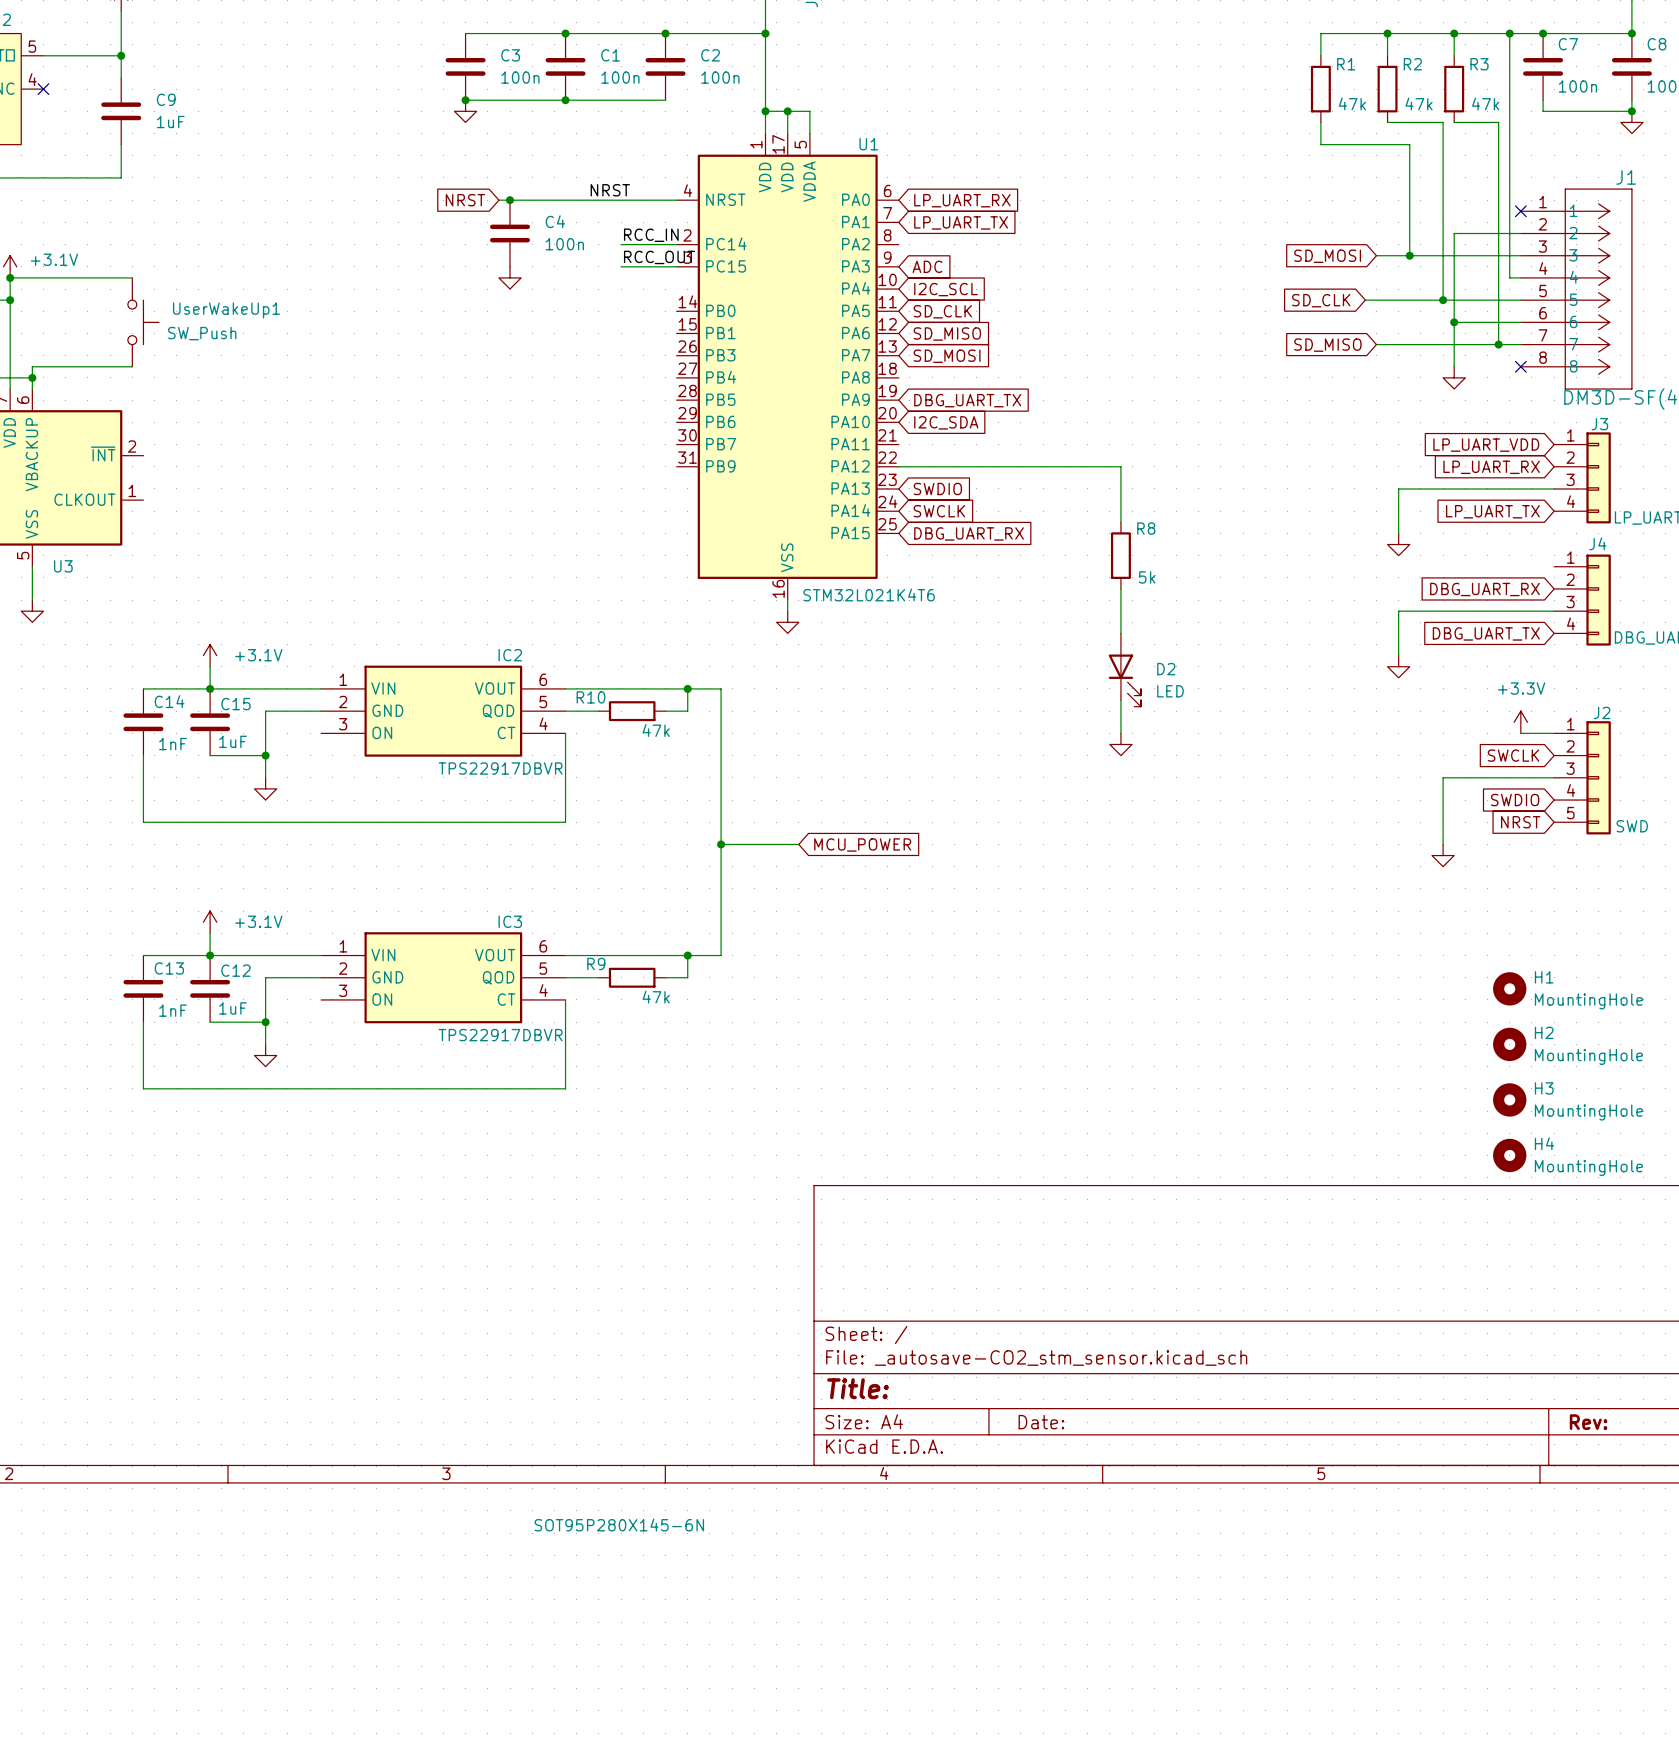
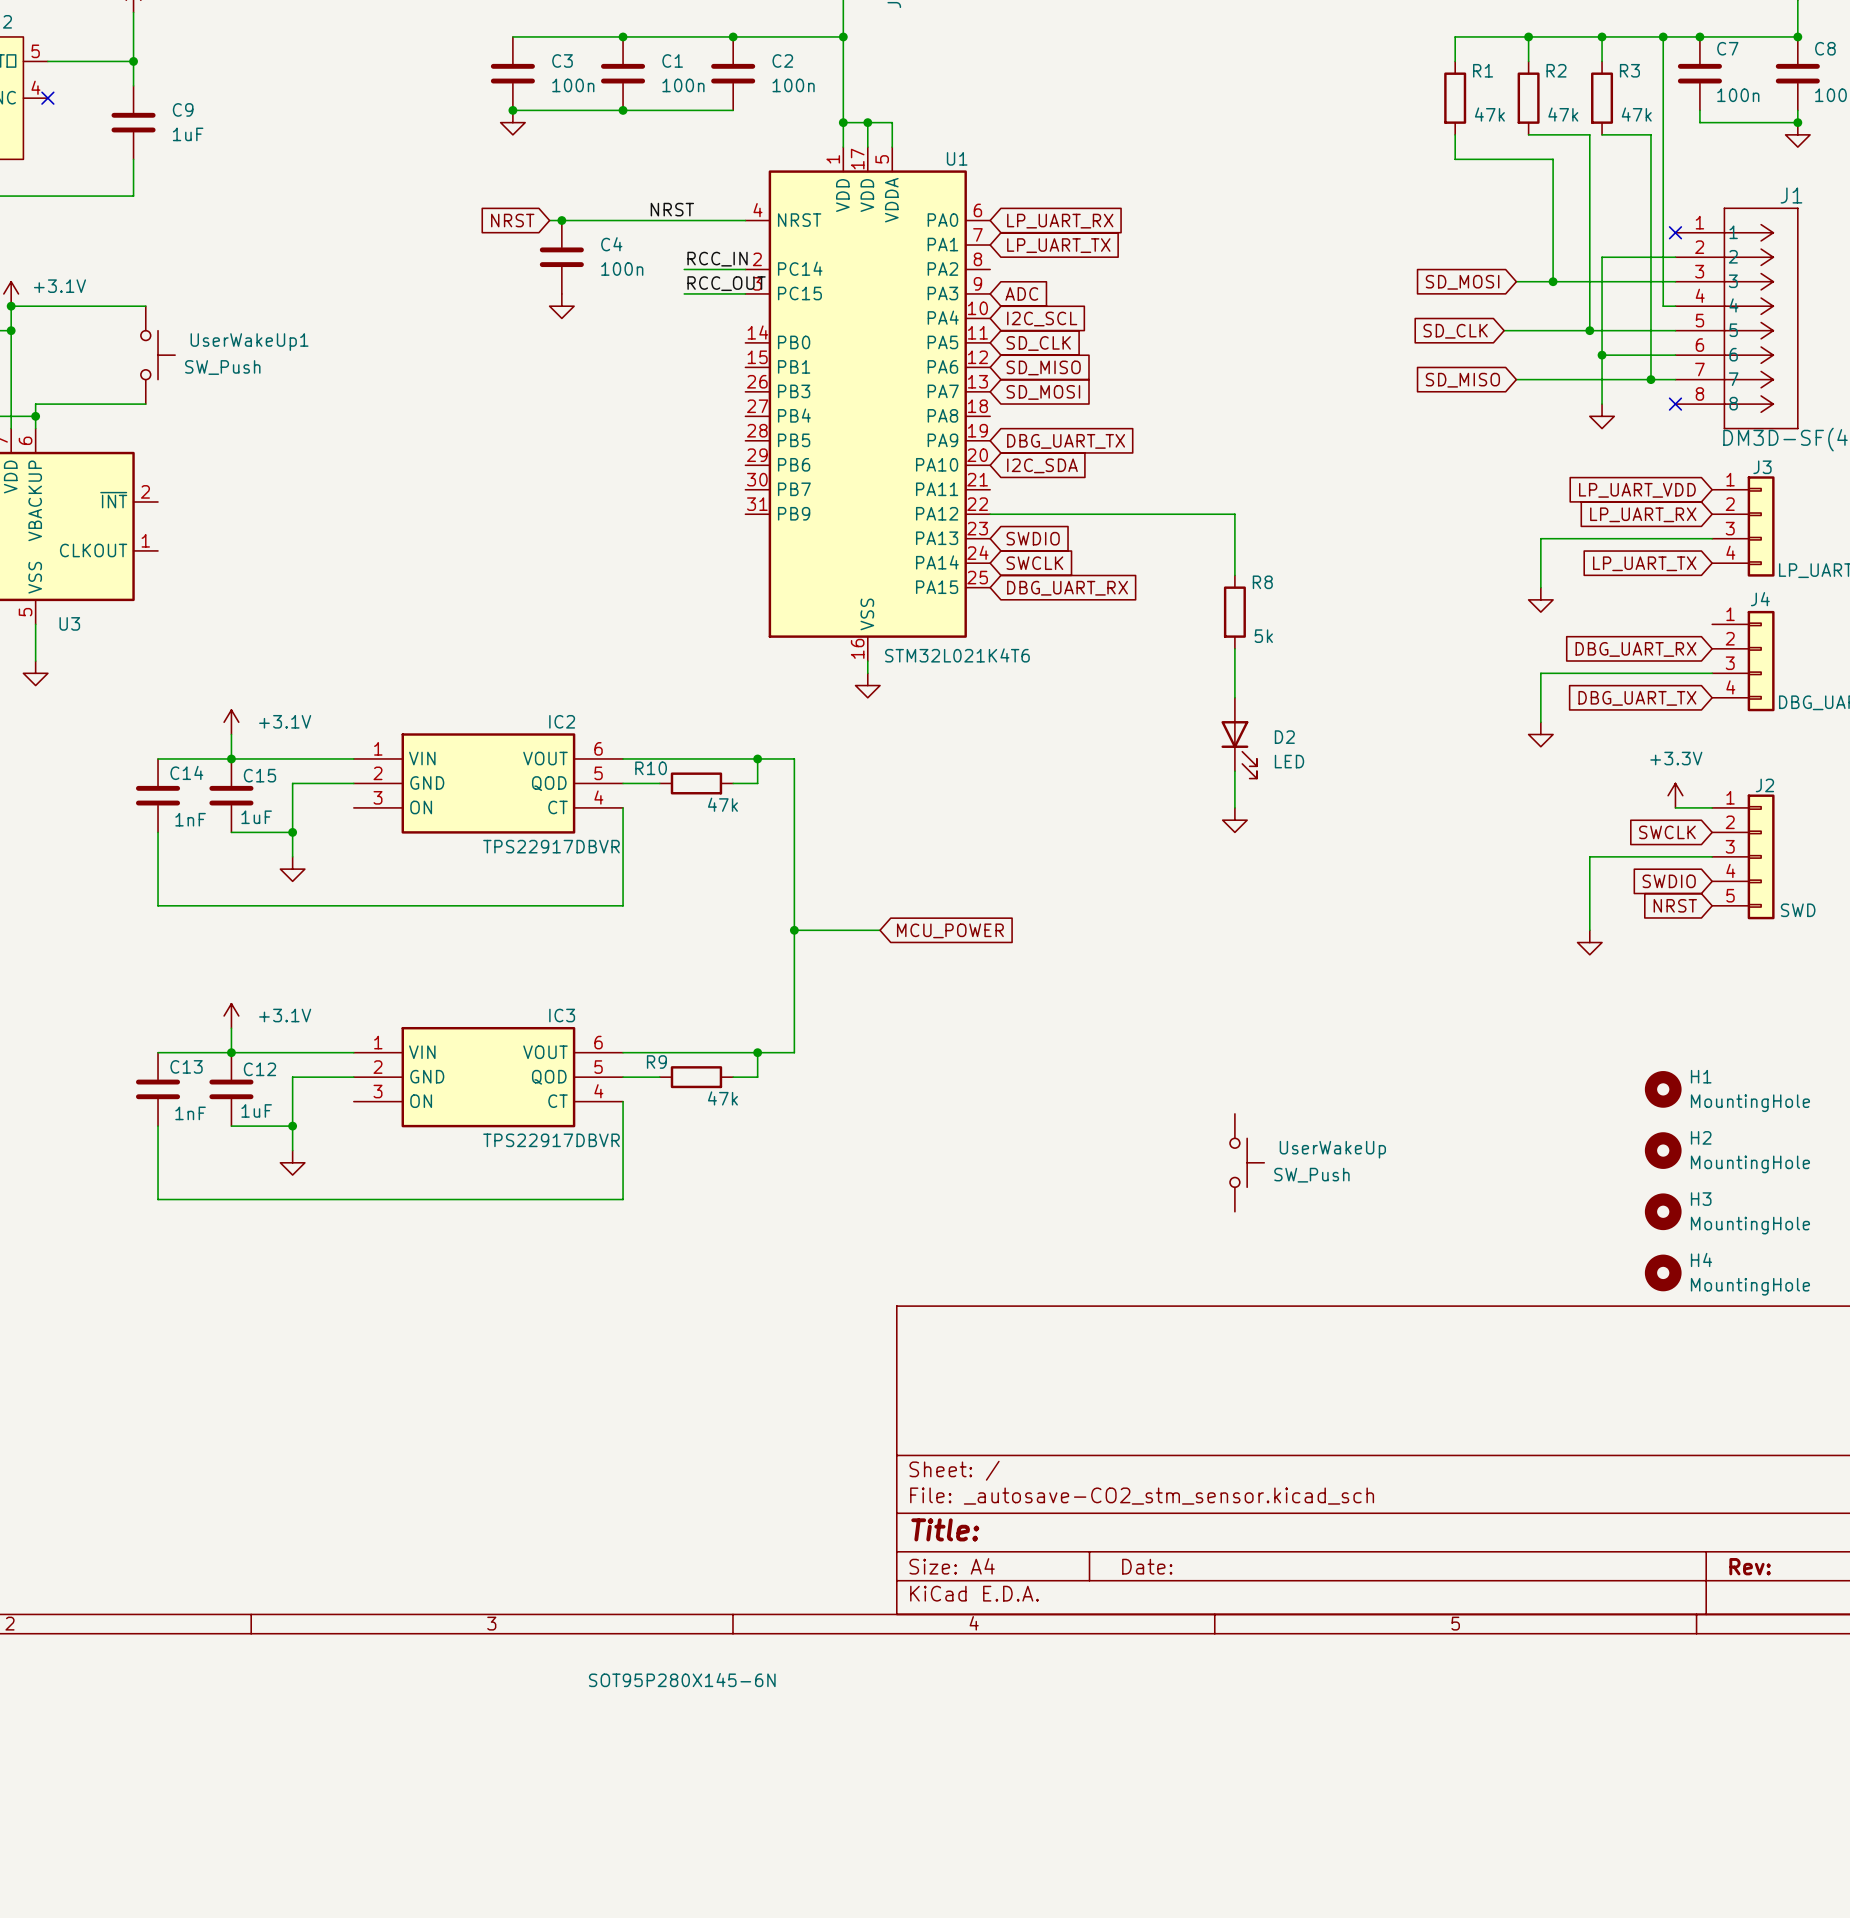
UserWakeUp: none -> SW_Push (1247, 1162)

